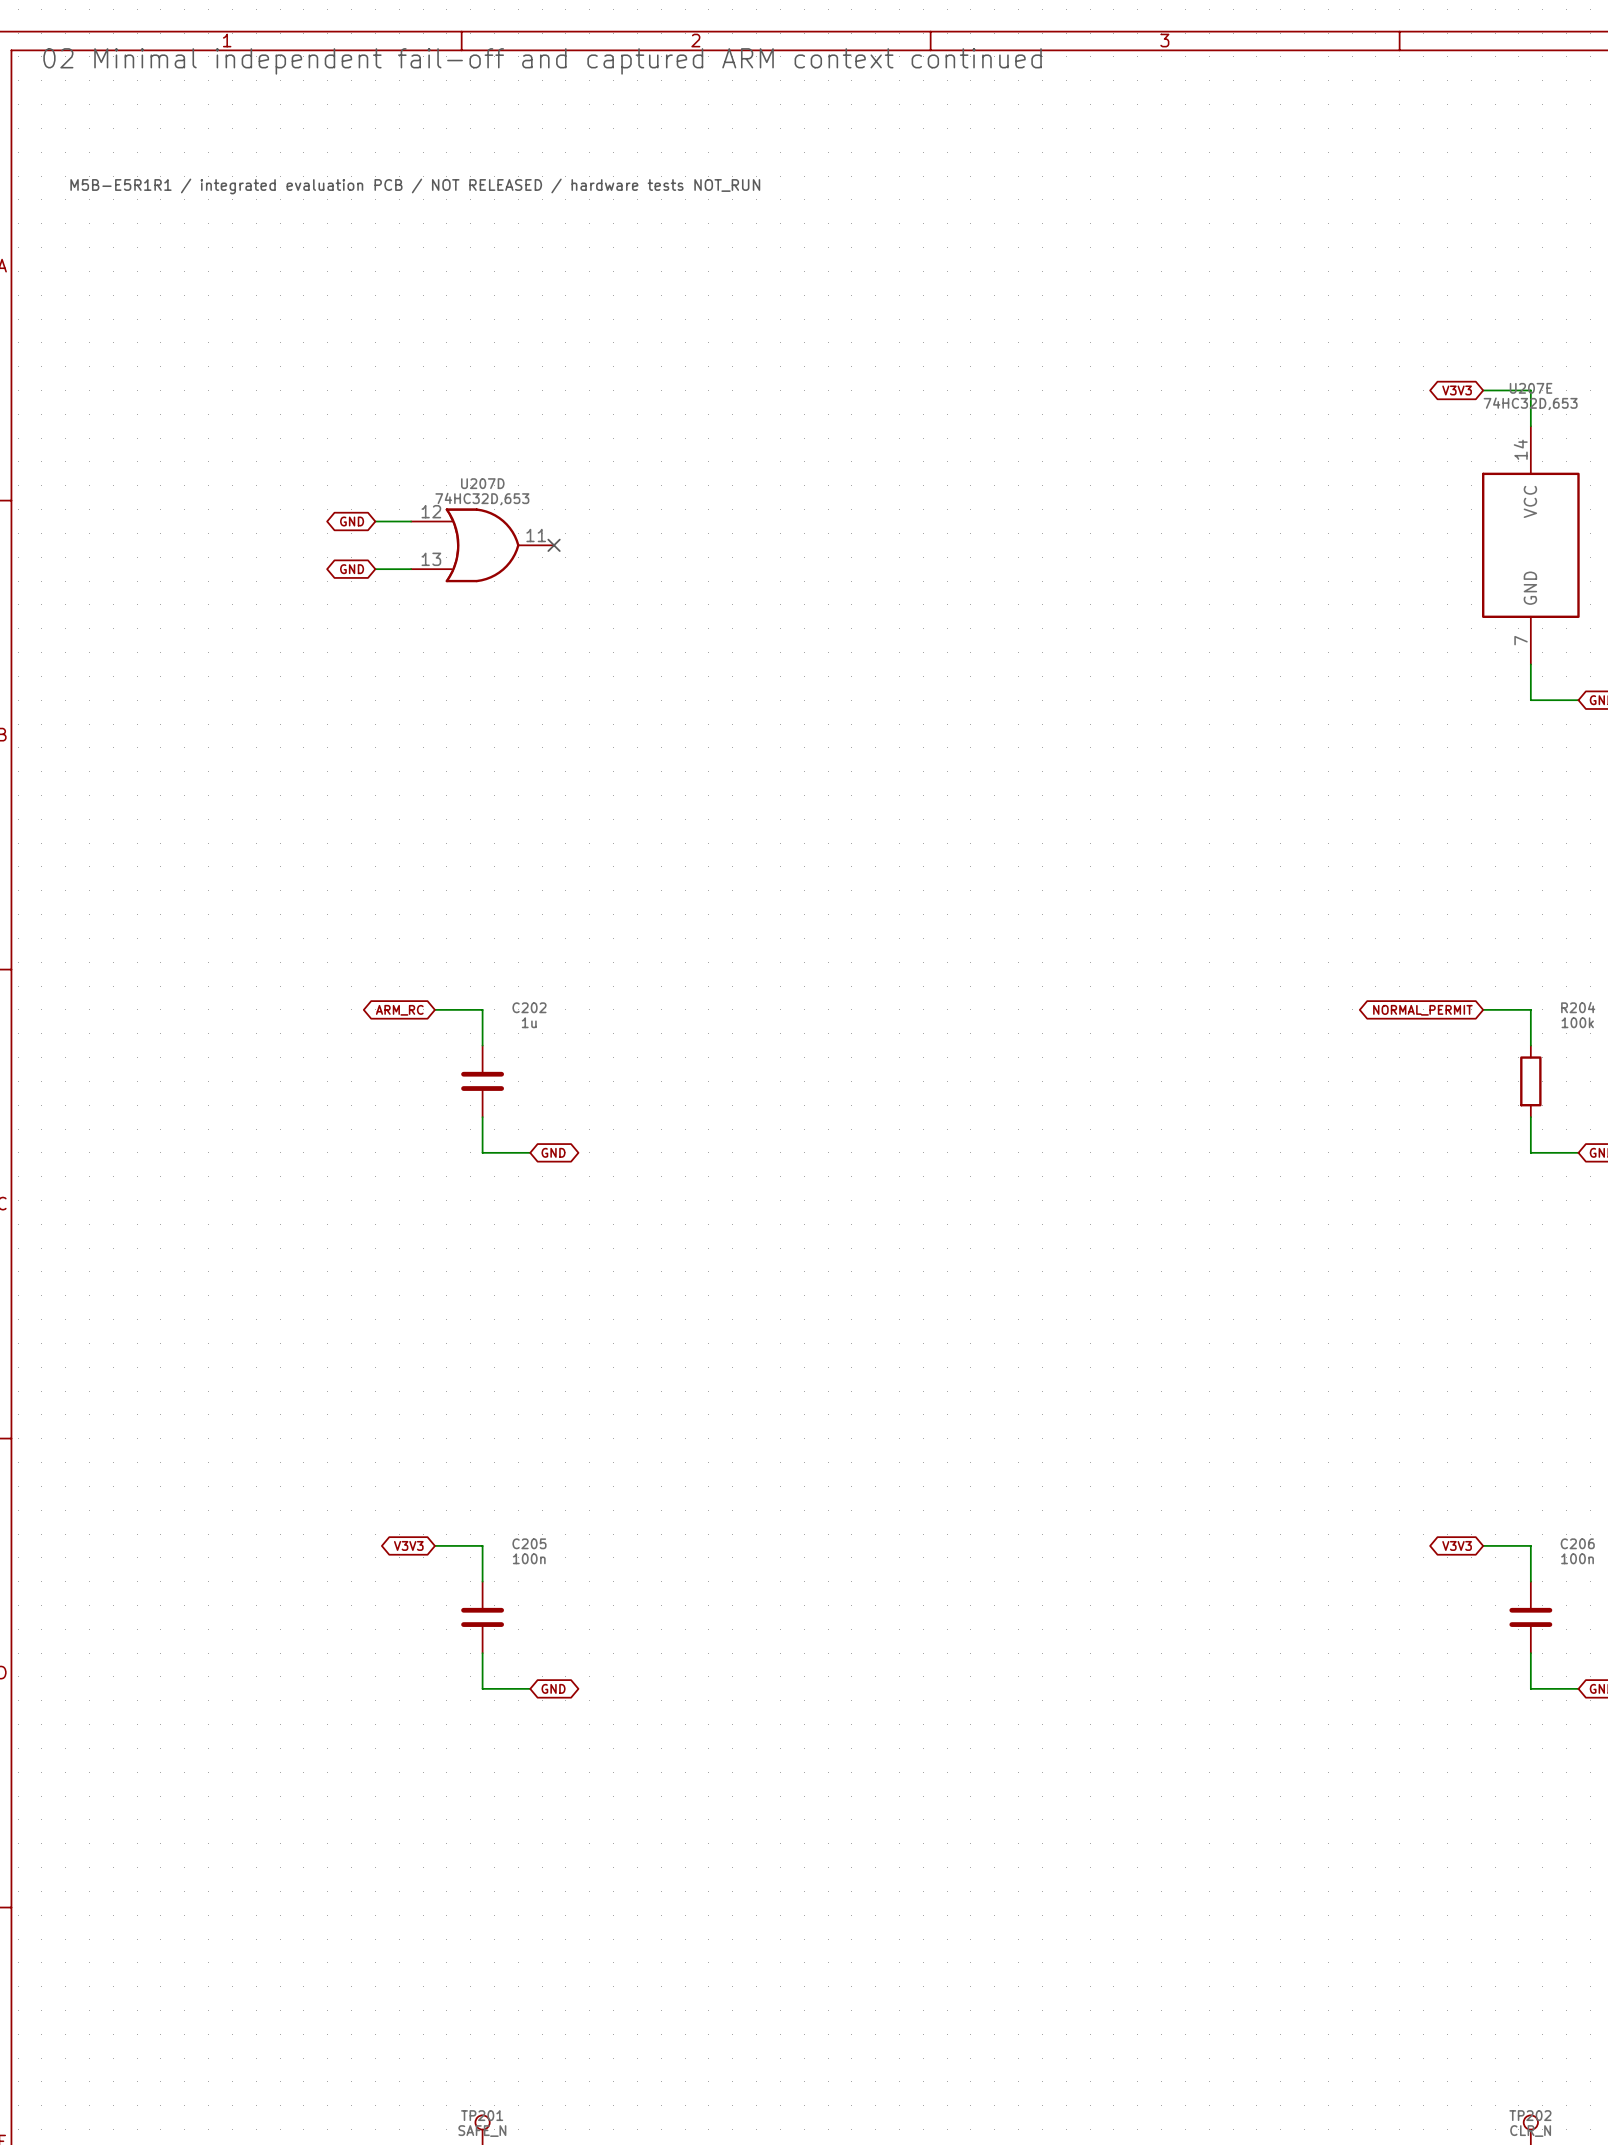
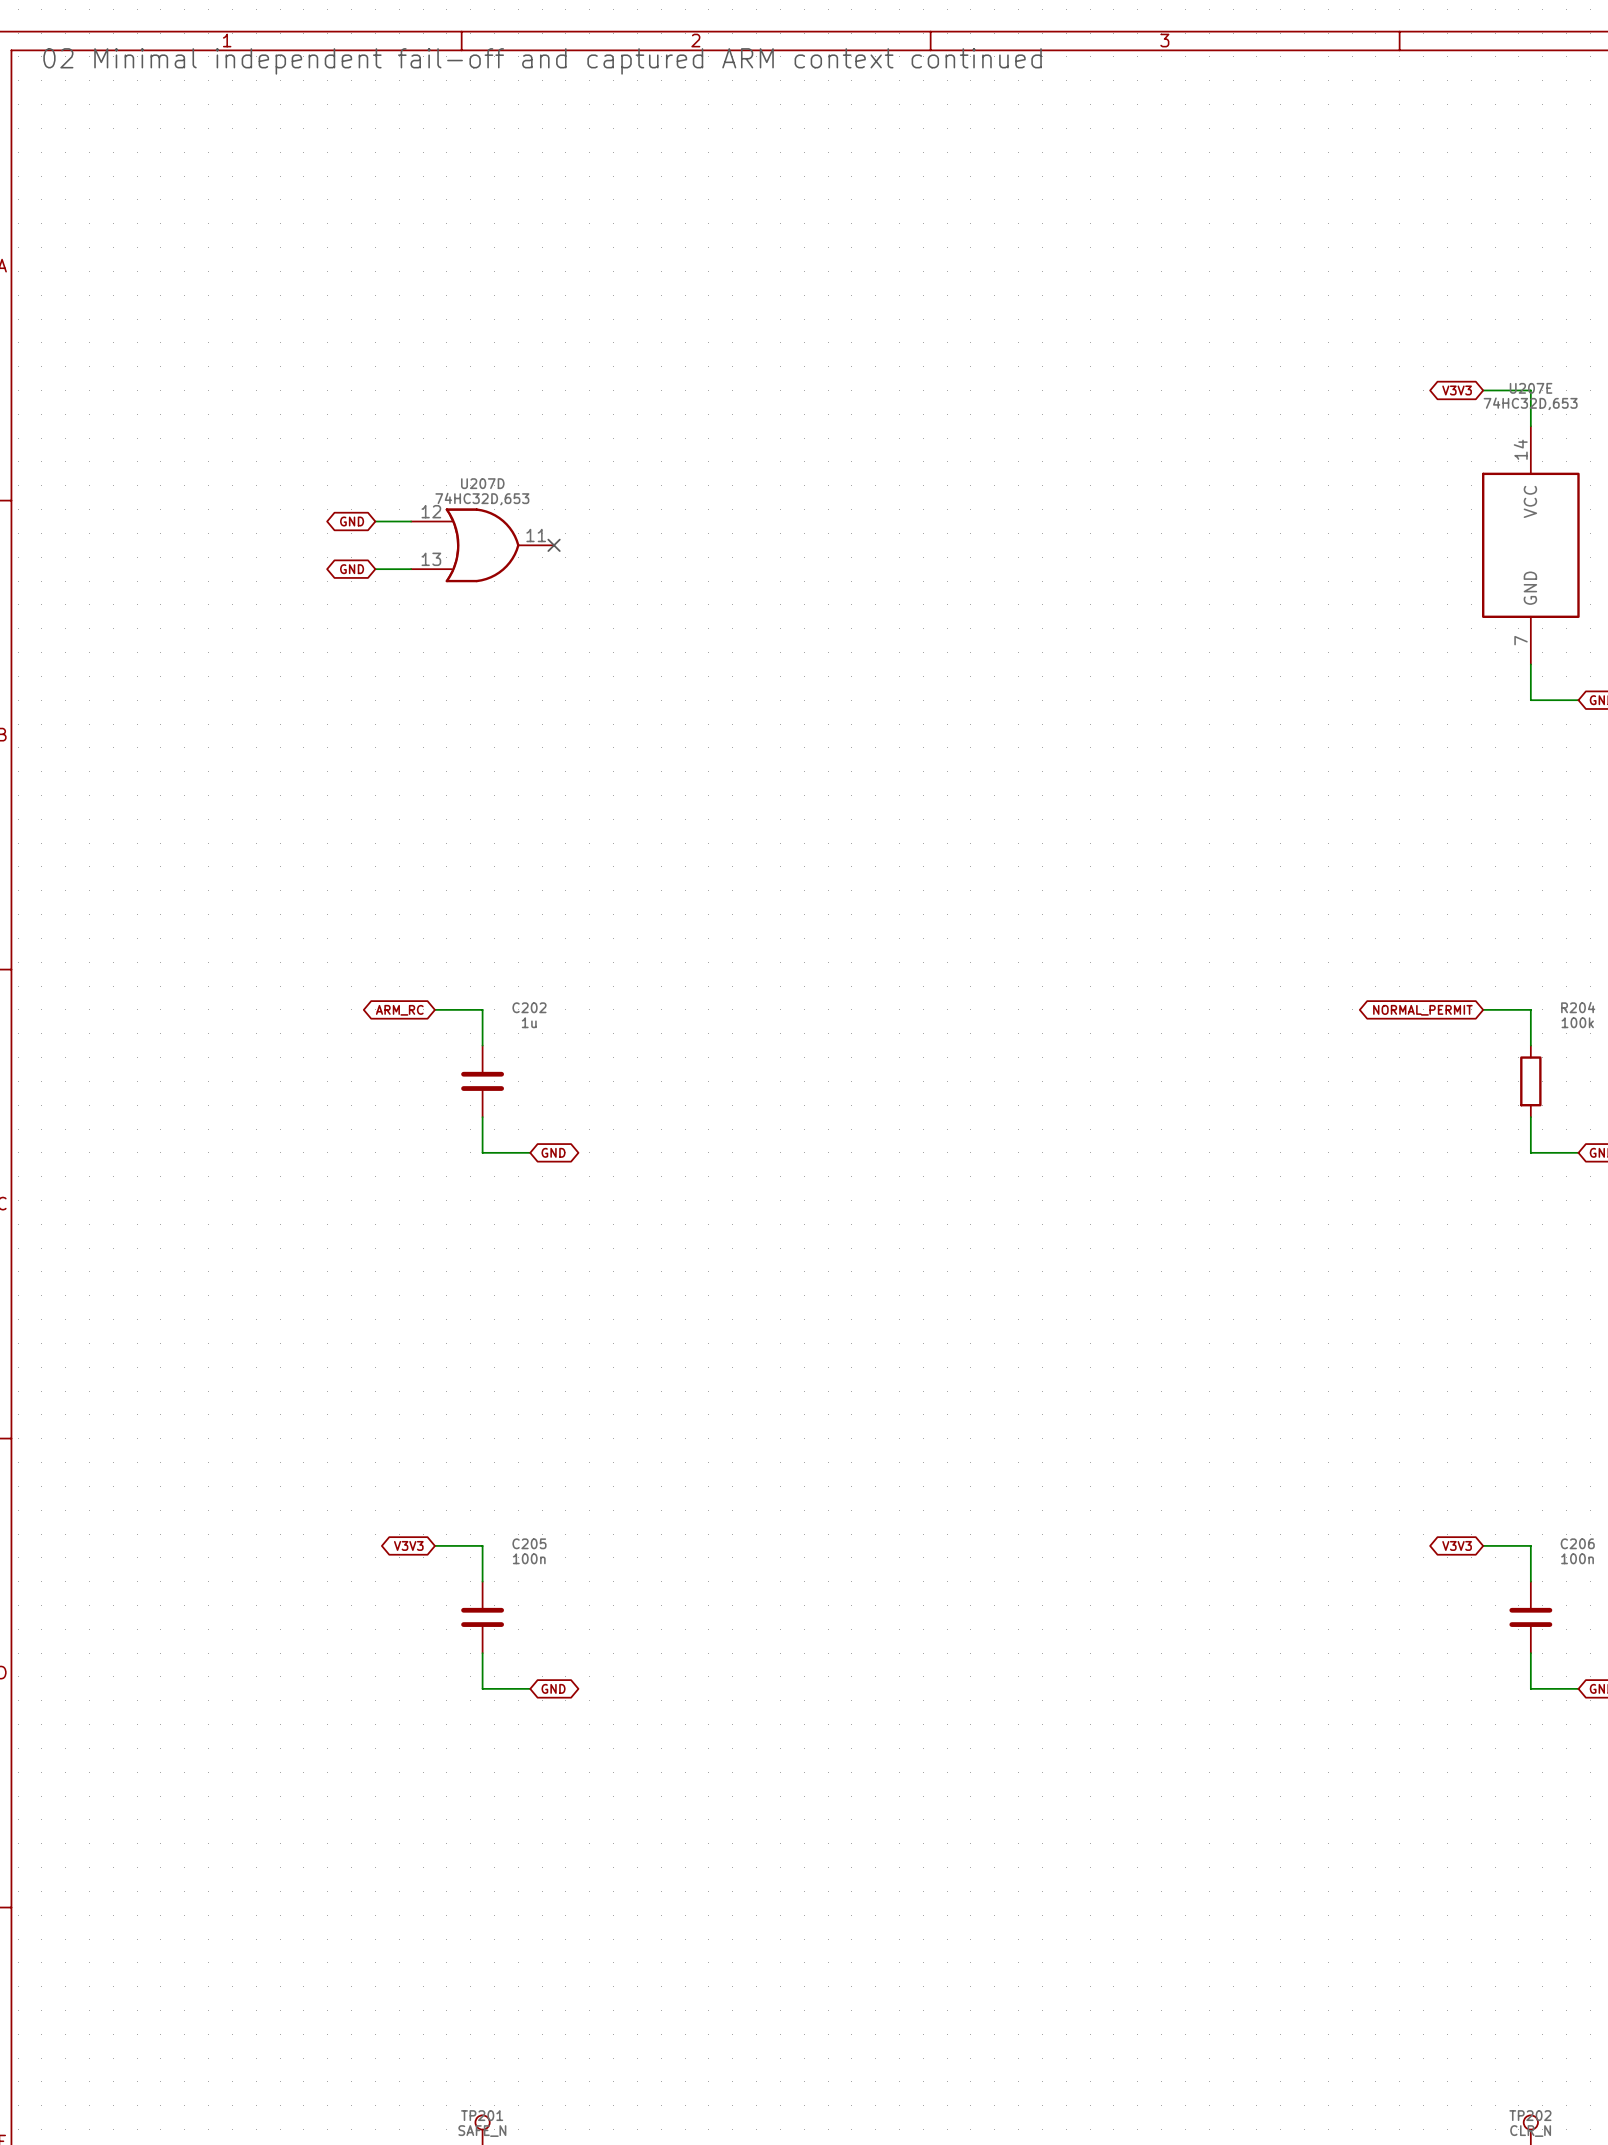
text: M5B-E5R1R1 / integrated evaluation PCB / NOT RELEASED / hardware tests NOT_RUN (415, 186) -> none

